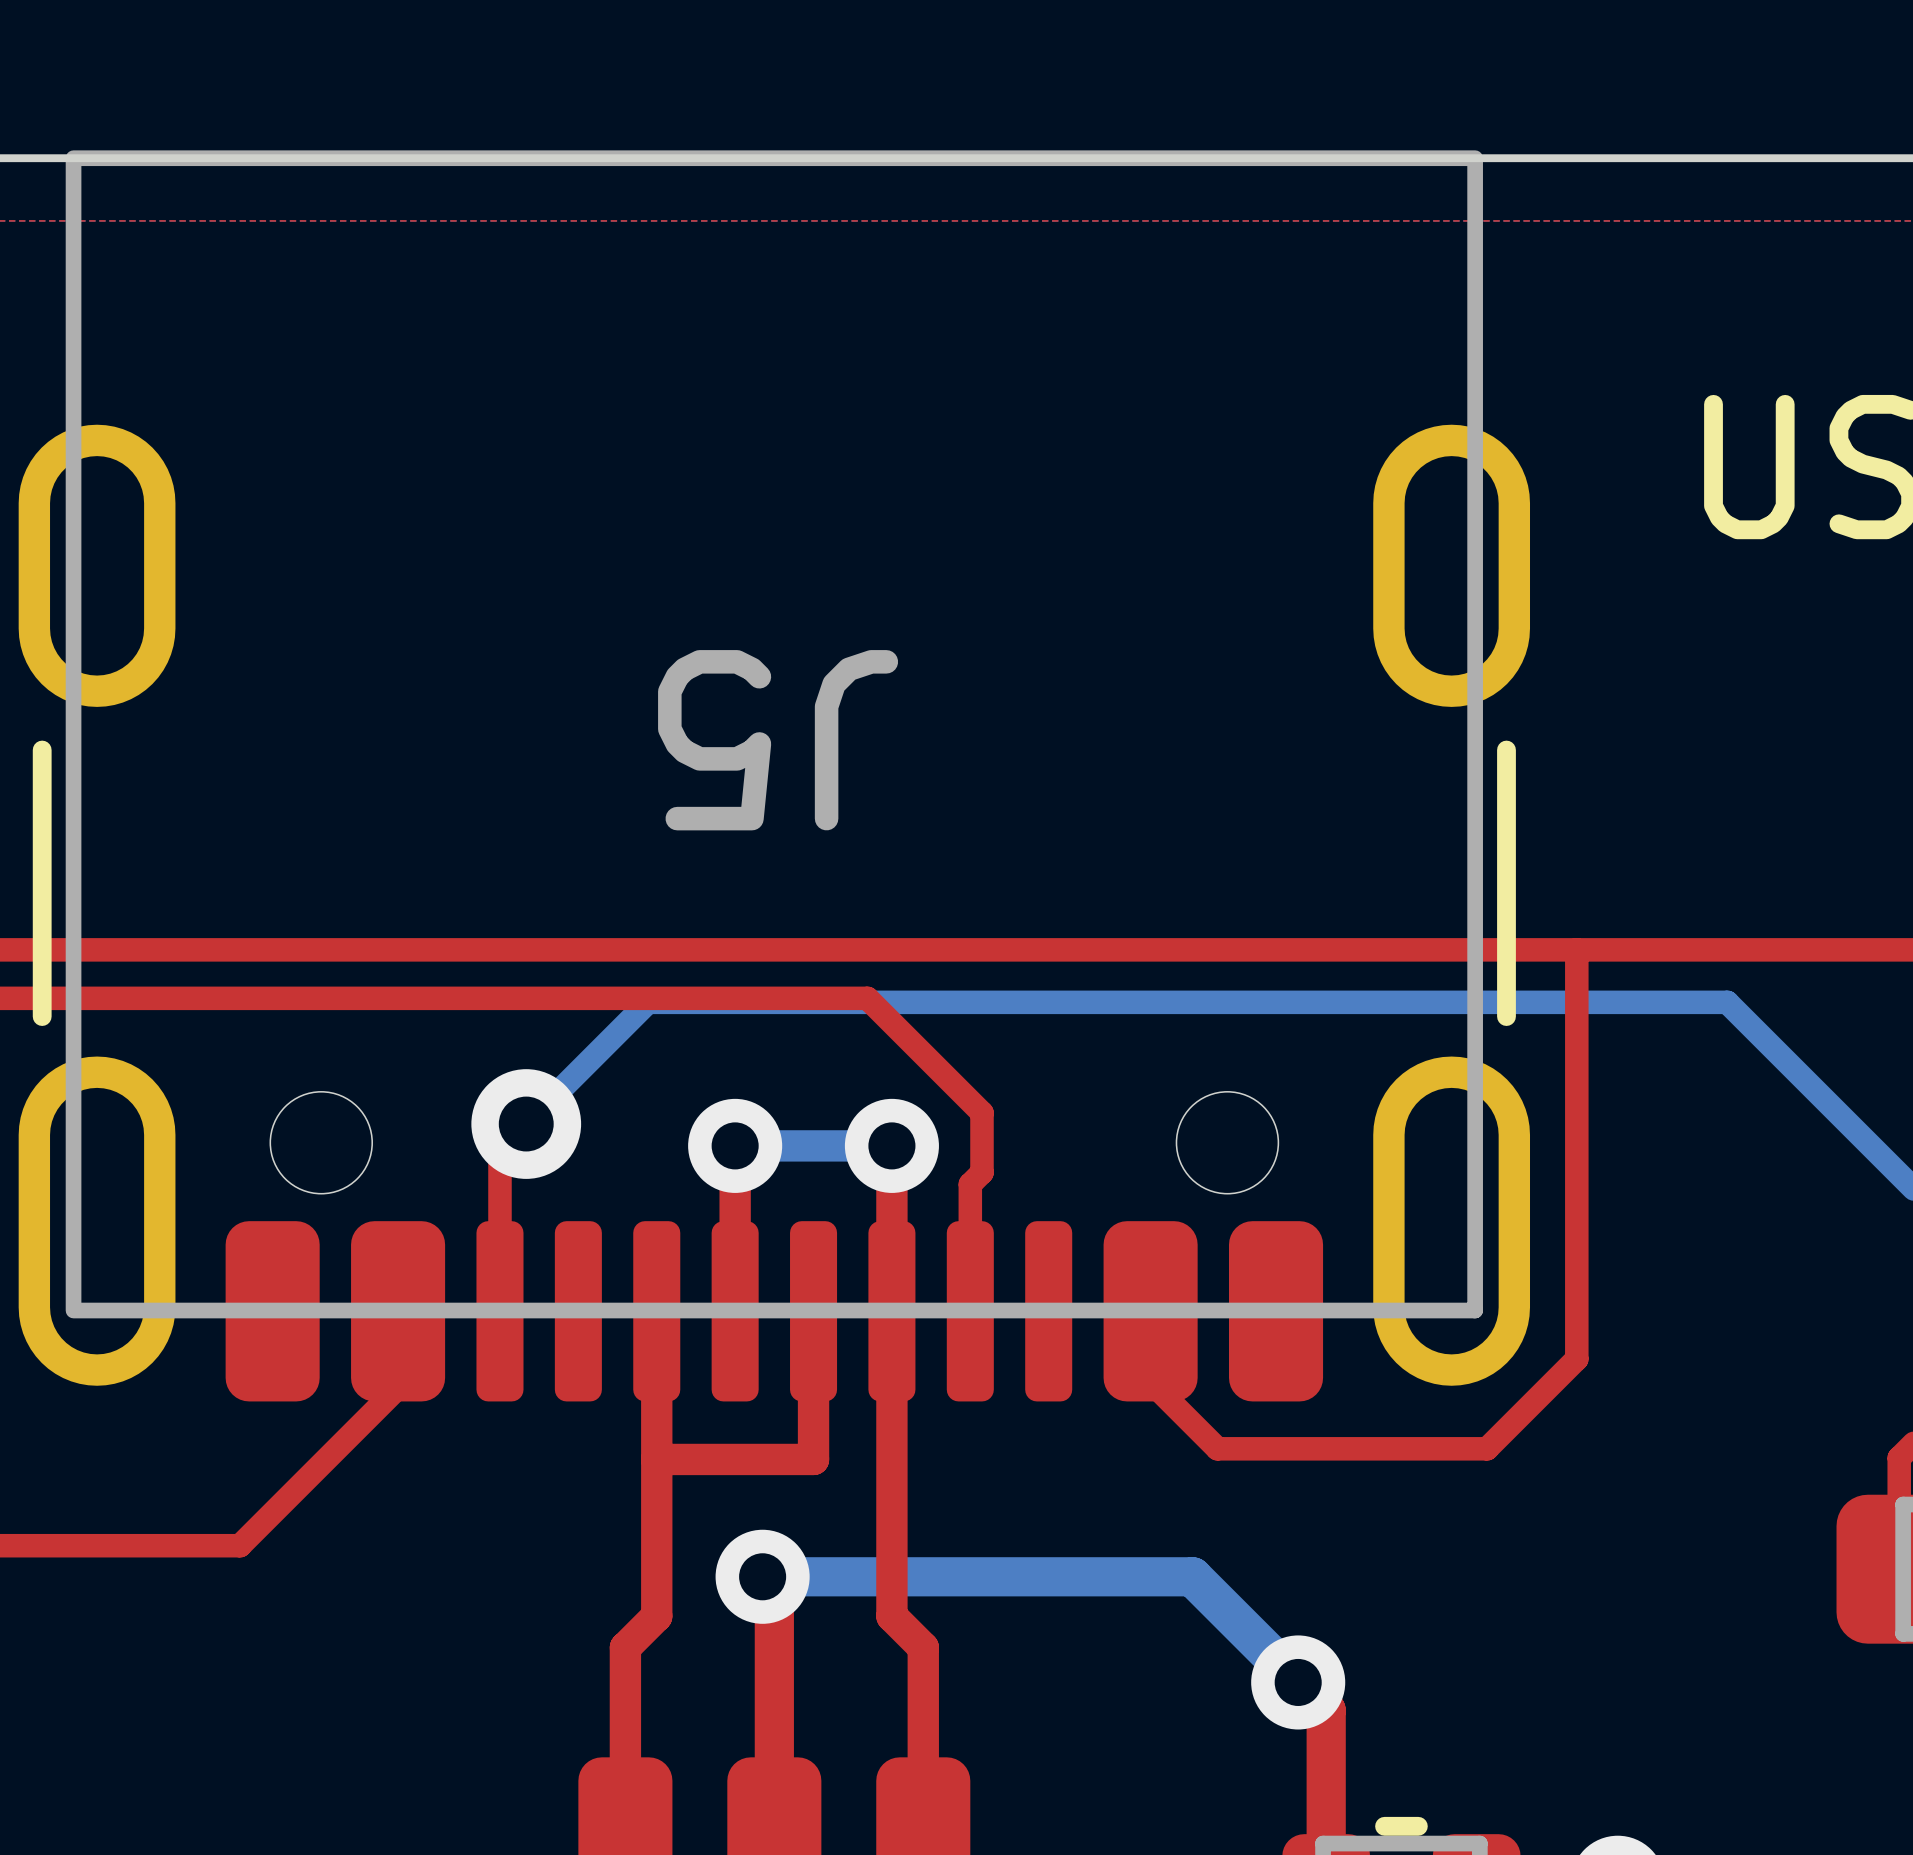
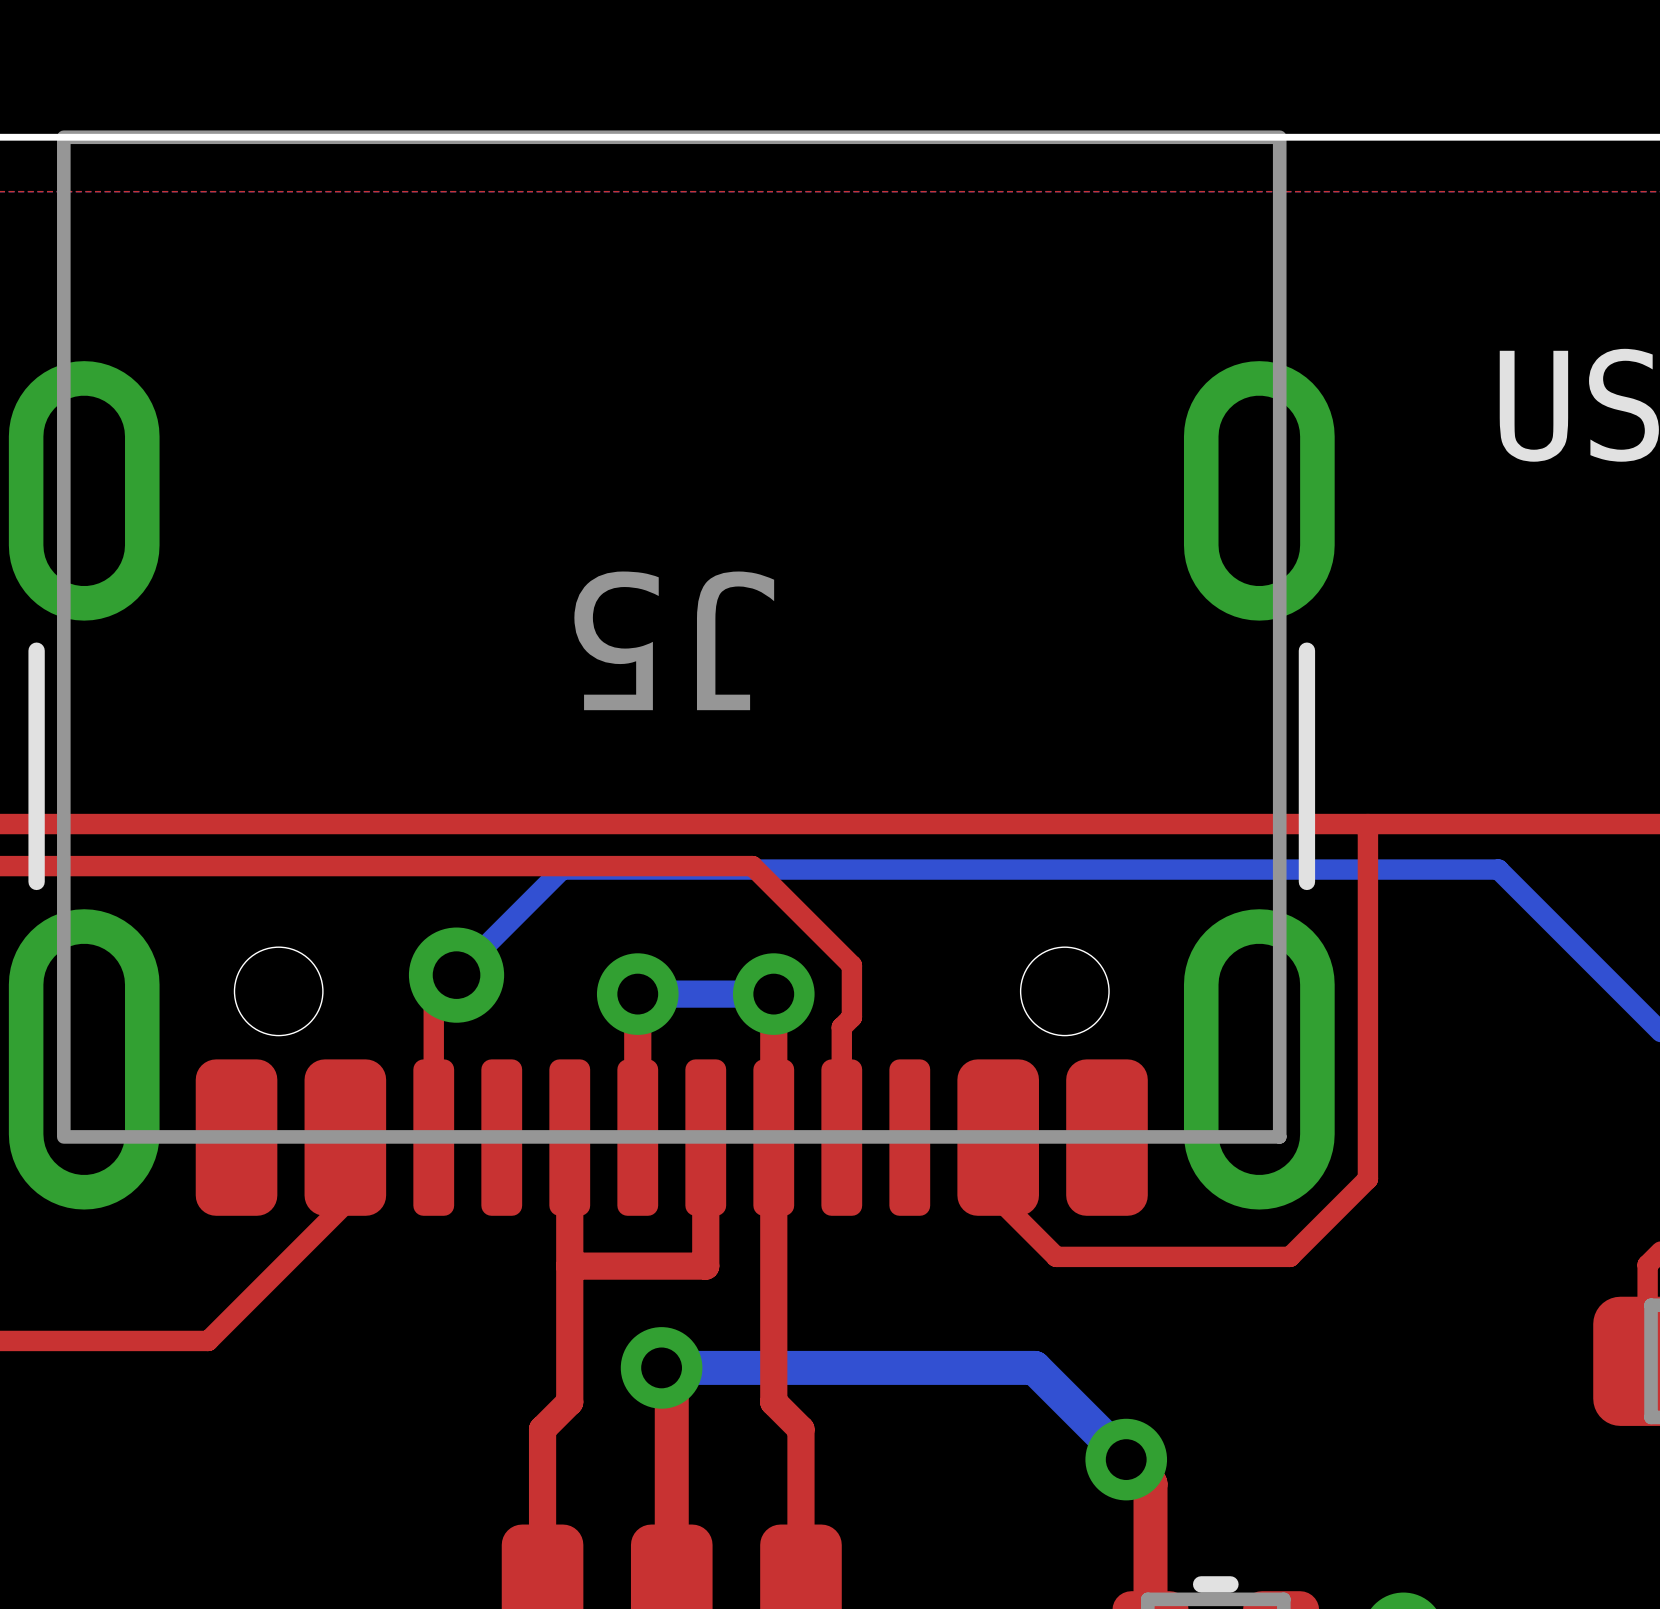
J5 footprint: [18, 150, 1531, 1402] -> [8, 130, 1335, 1216]

